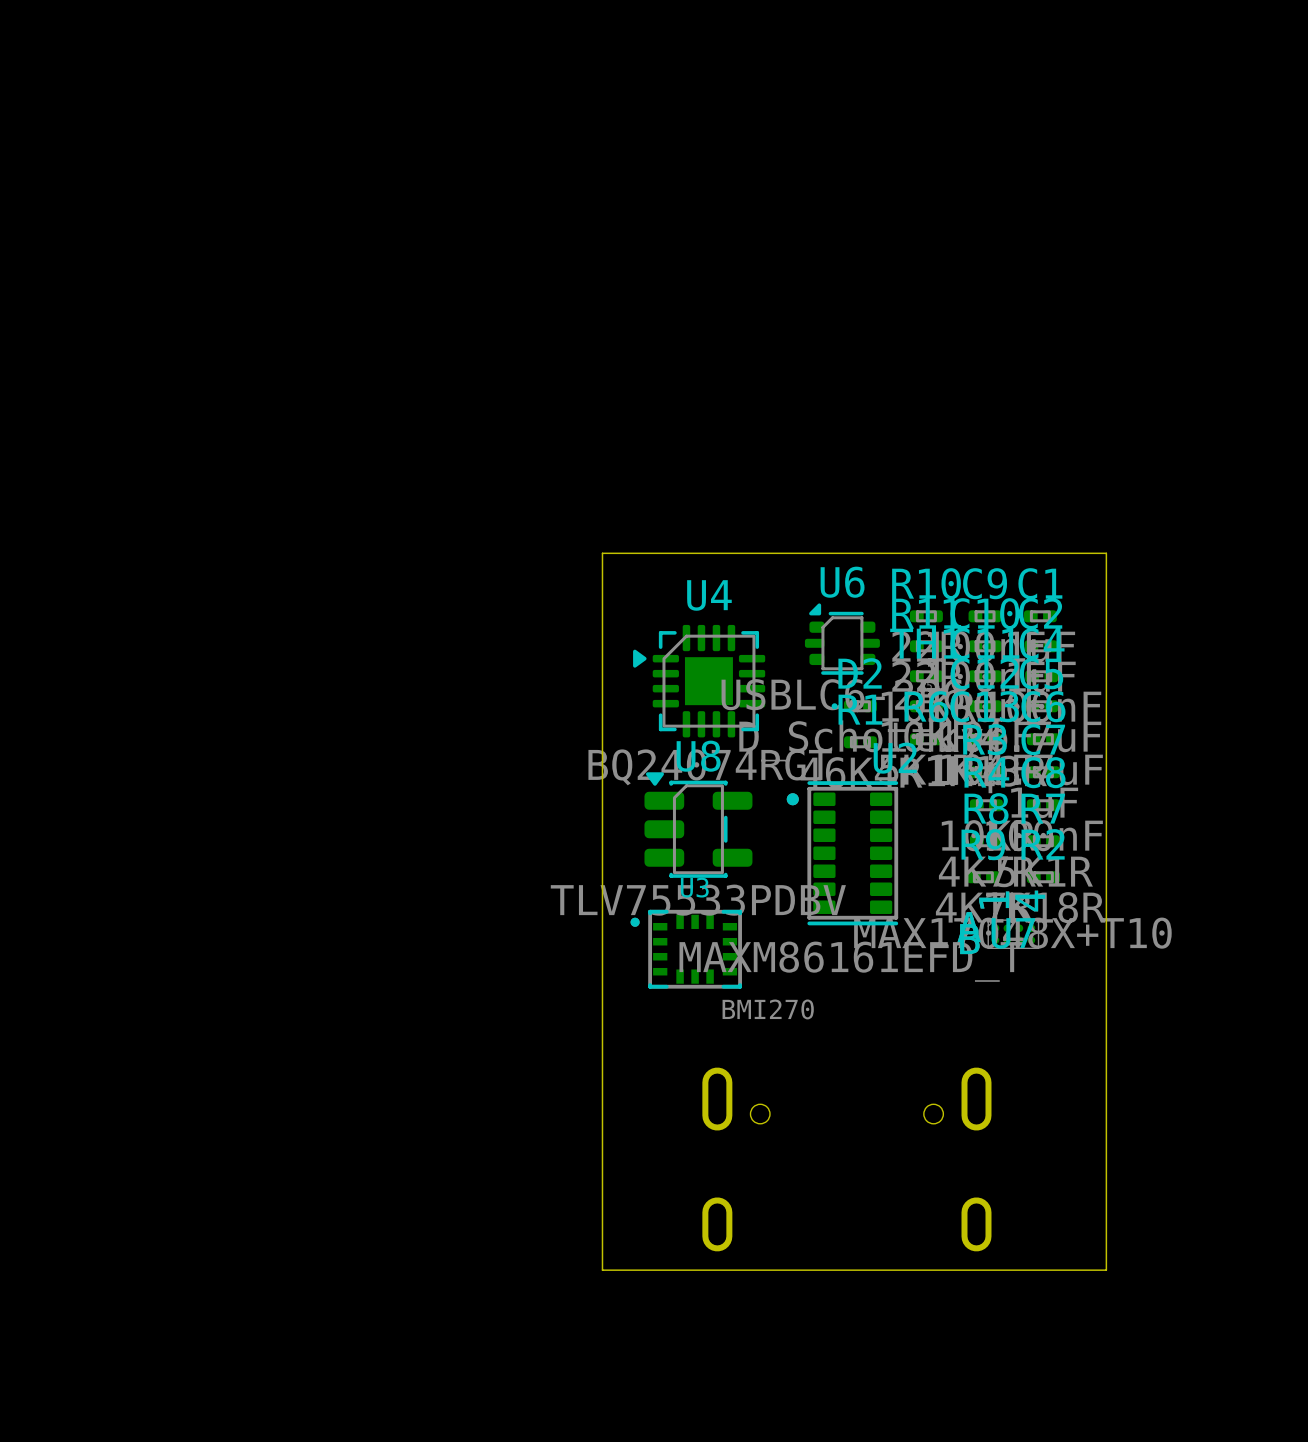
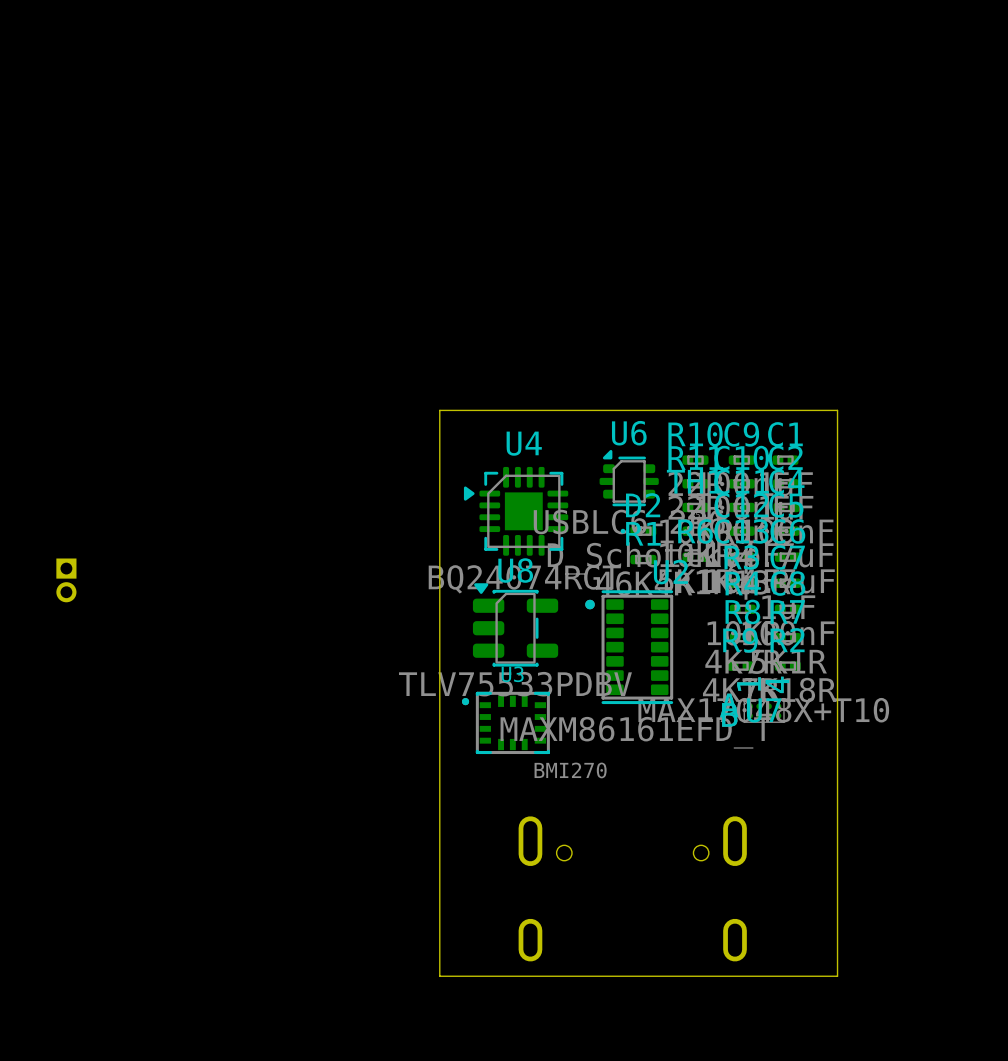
part: none -> (66, 580)

